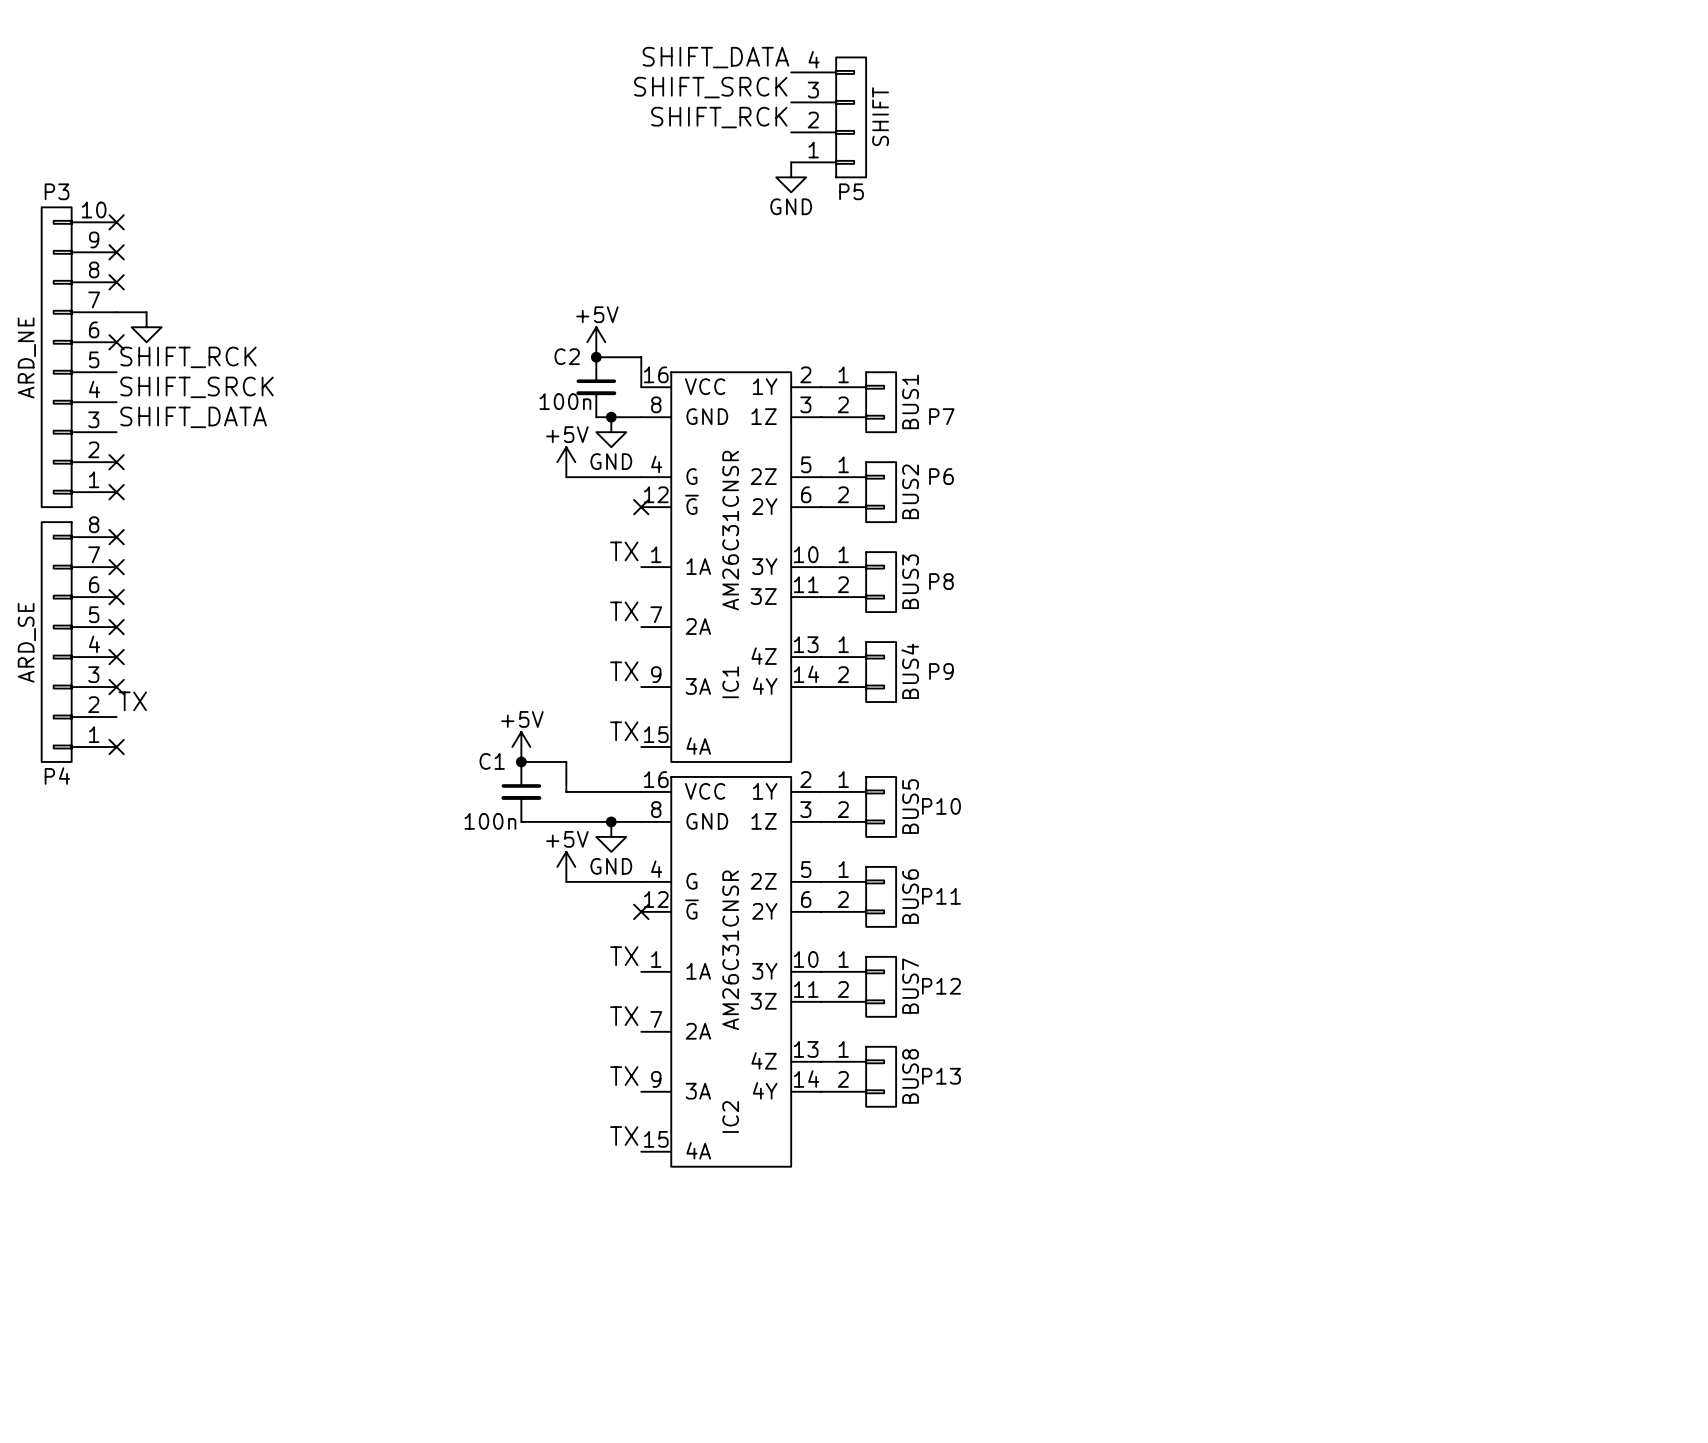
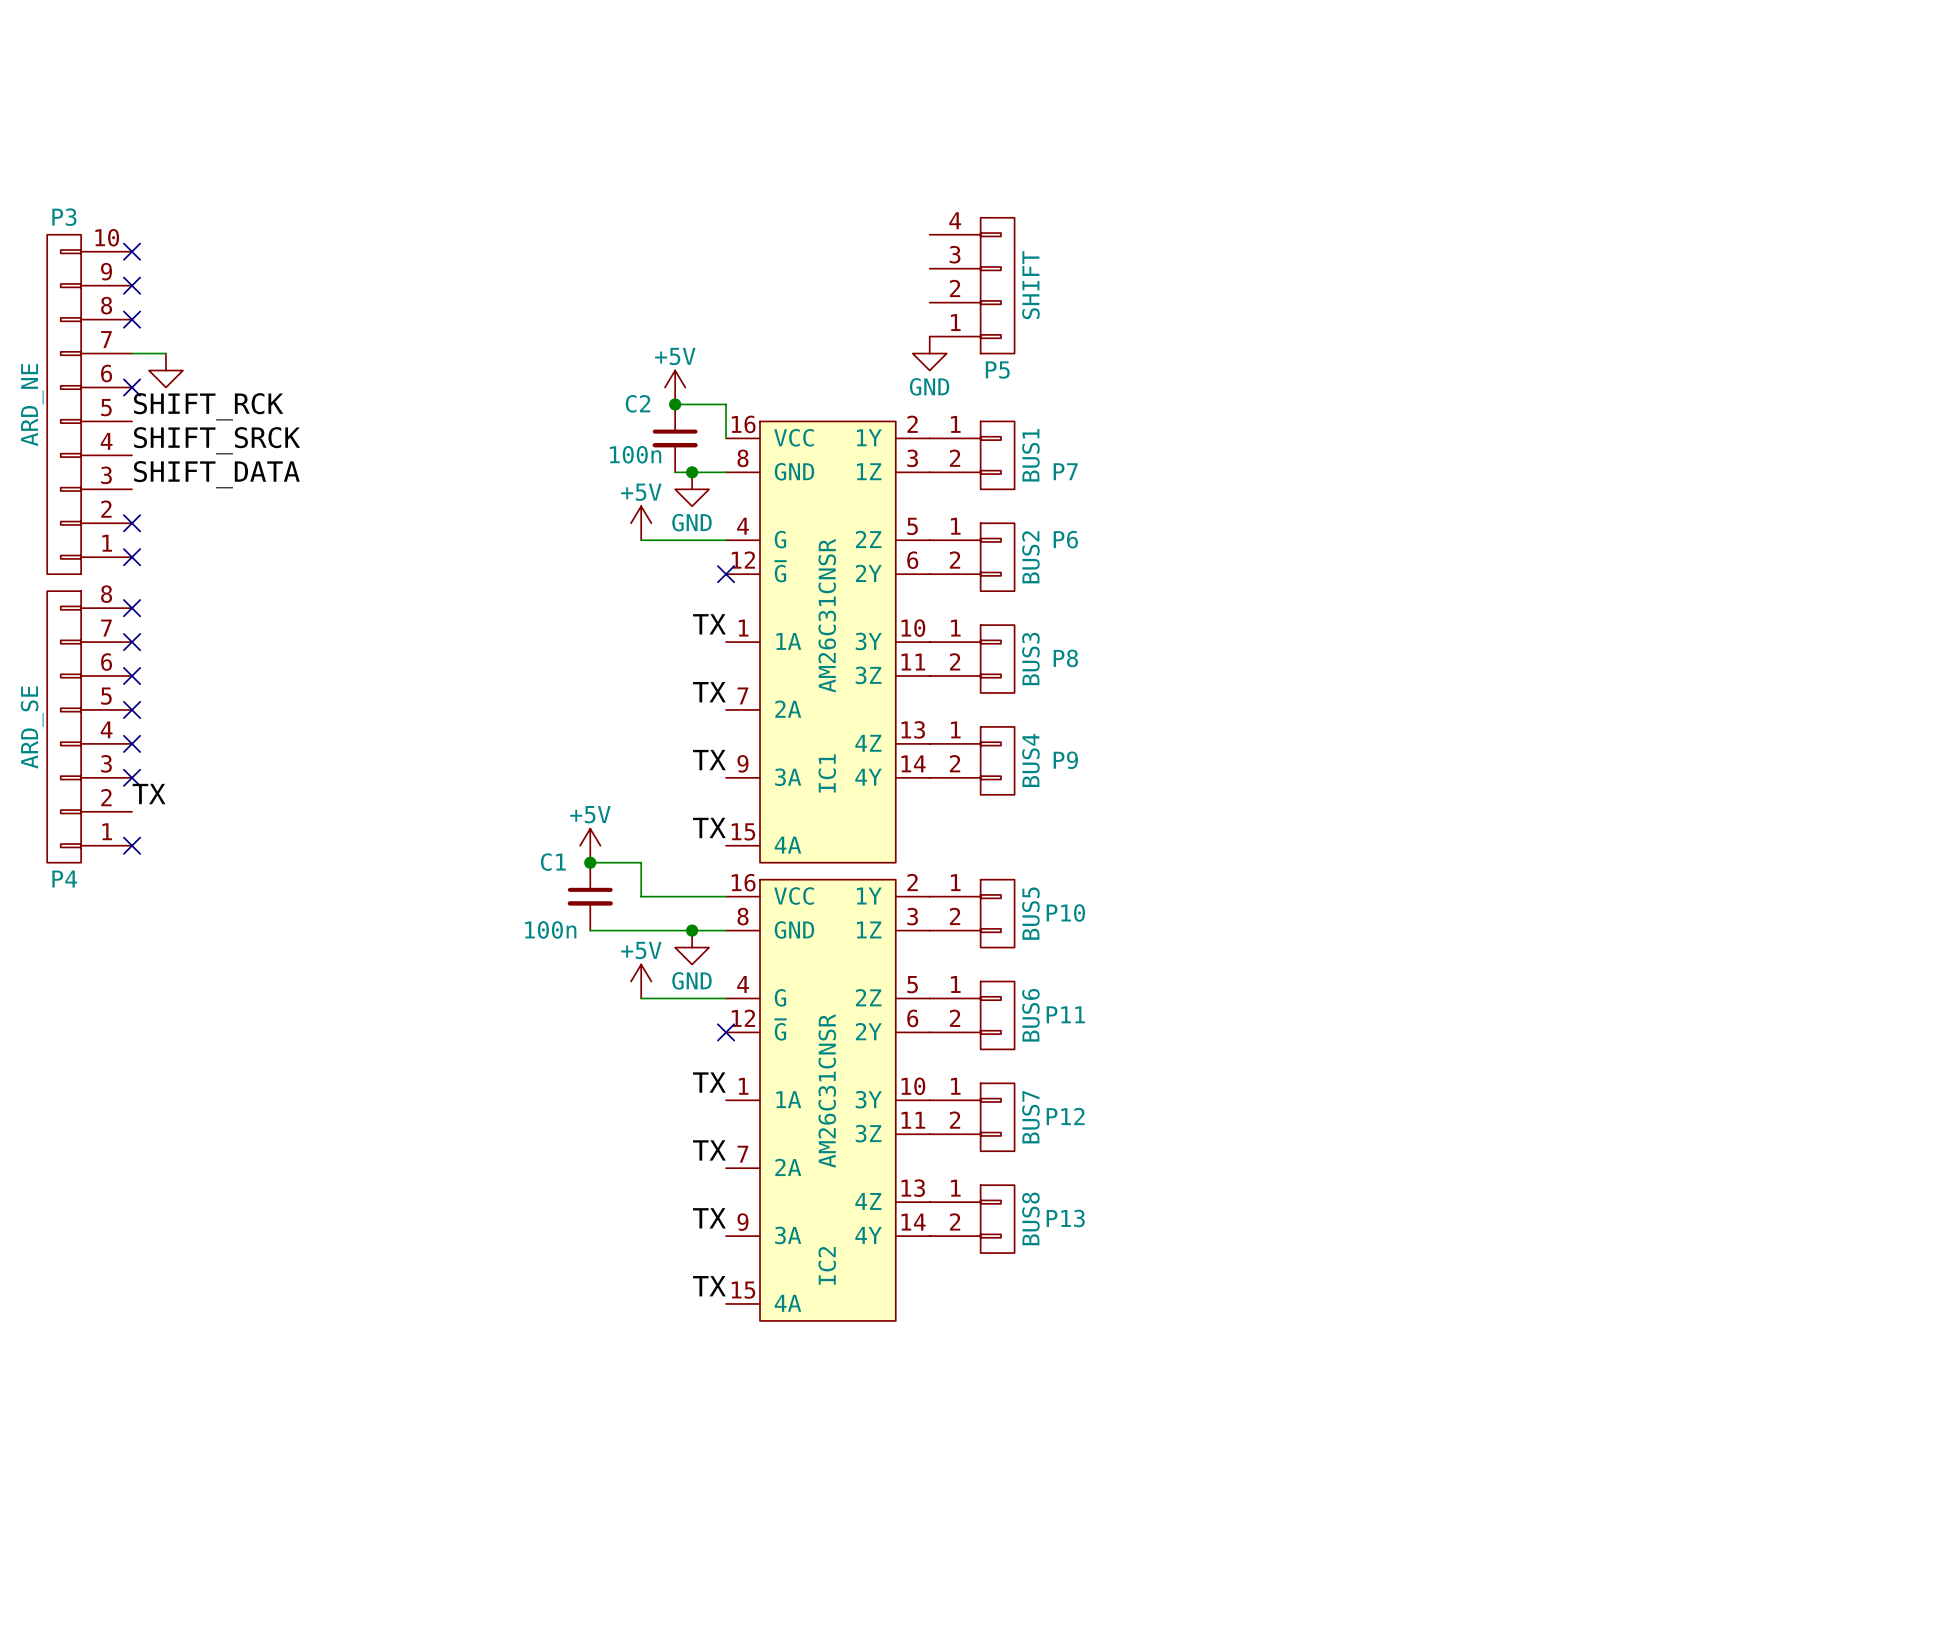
label: SHIFT_DATA (715, 57) -> none
label: SHIFT_SRCK (710, 87) -> none
label: SHIFT_RCK (719, 117) -> none
P5 position: (828, 117) -> (972, 285)
power symbol position: GND (791, 177) -> GND (929, 353)

